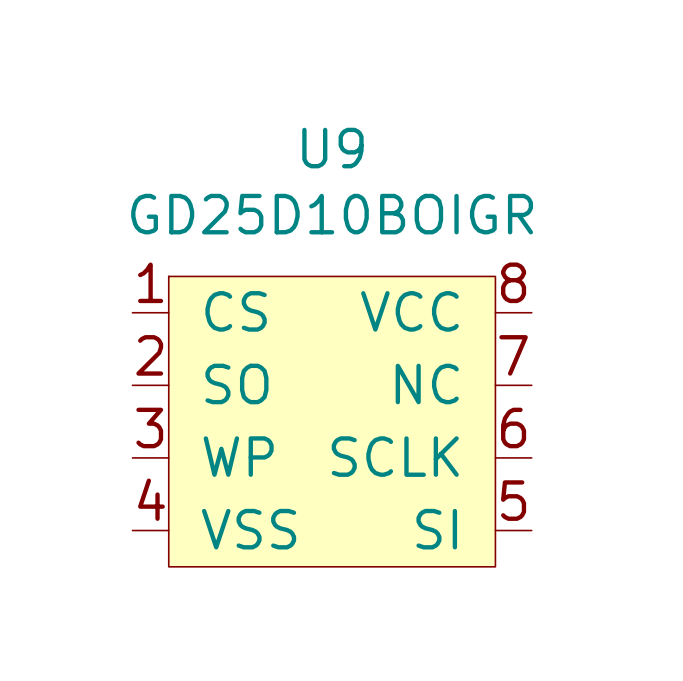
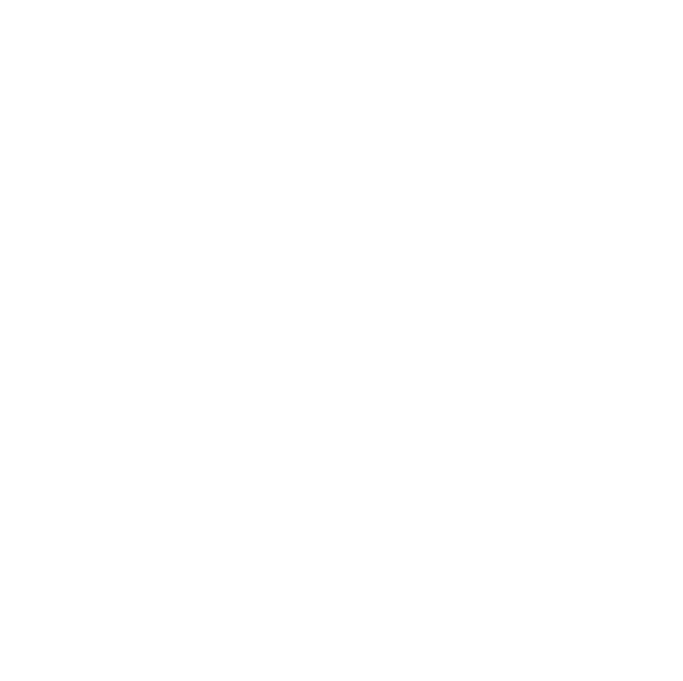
U9: GD25D10BOIGR (332, 421) -> none

